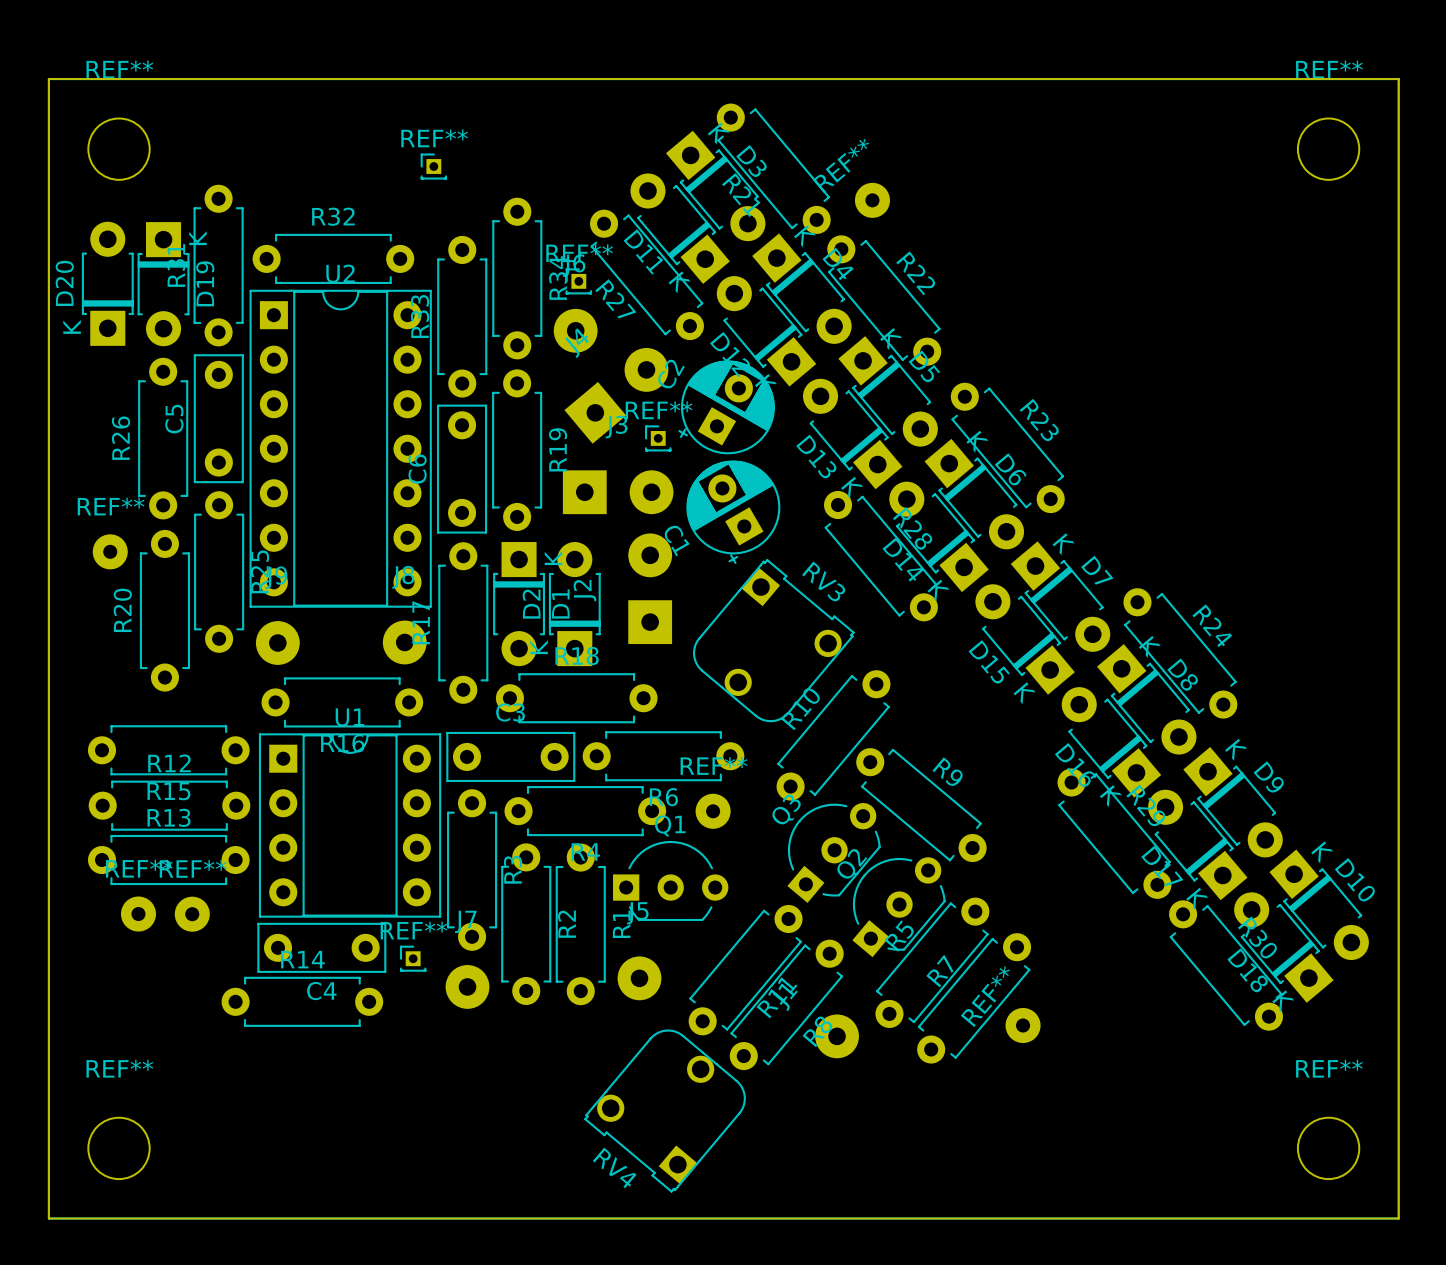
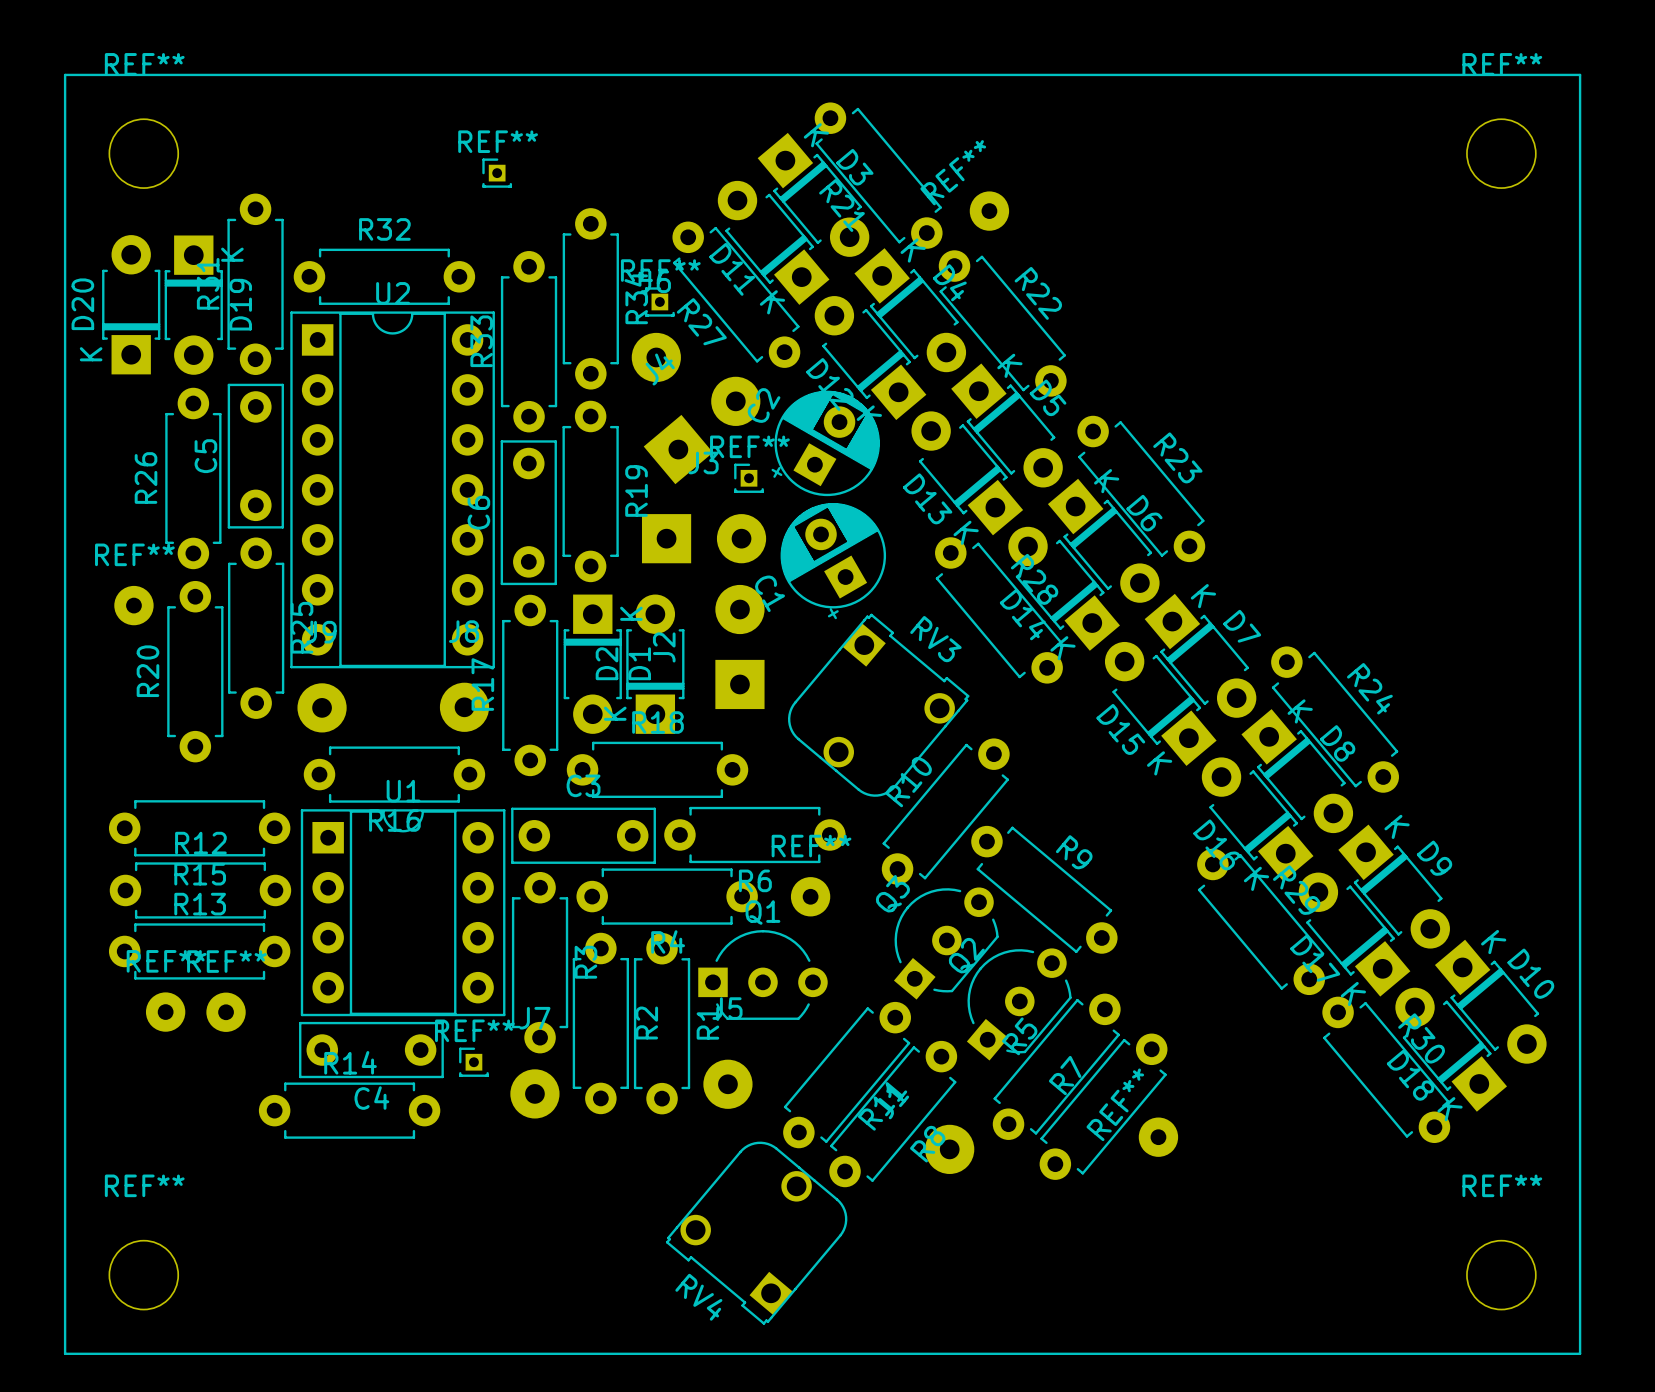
board edge: (48, 79) (1398, 79) (1398, 1218) (48, 1218) (48, 79) -> none

